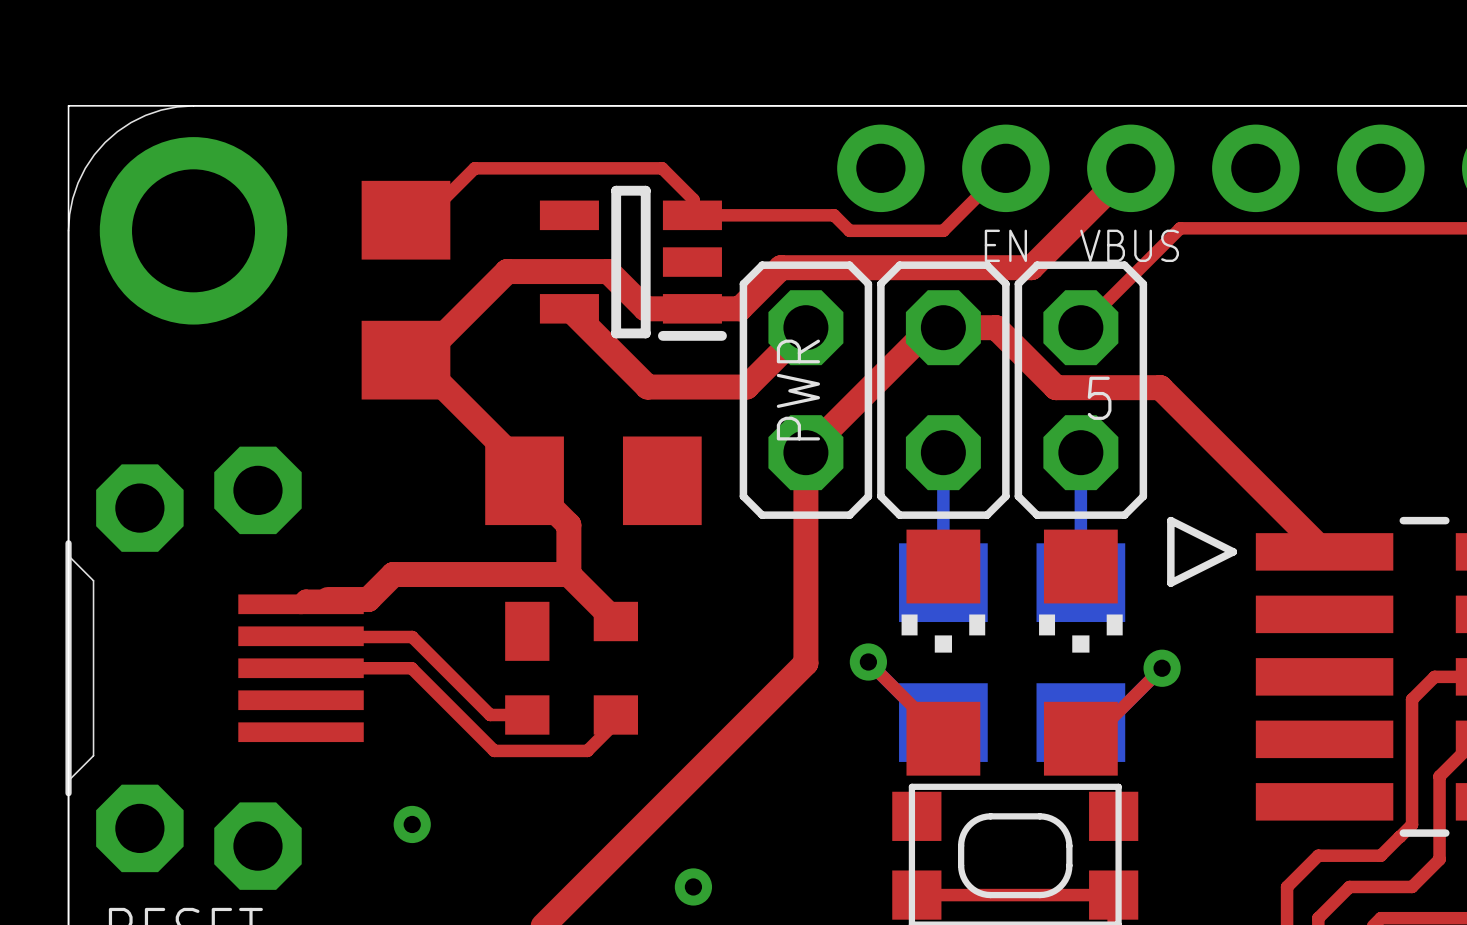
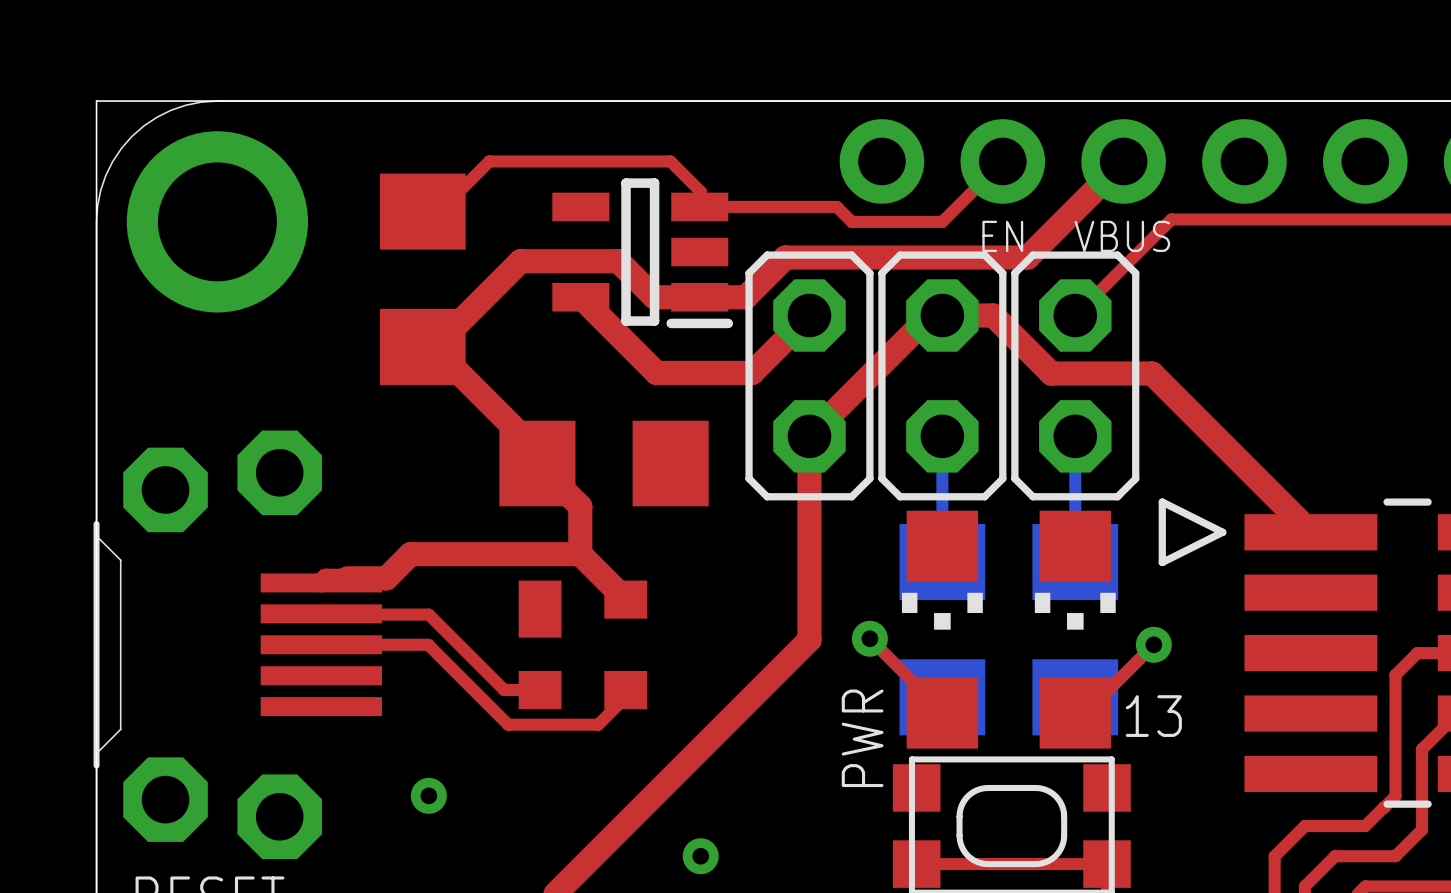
text position: PWR (798, 390) -> PWR (862, 738)
text: 5 (1099, 398) -> none
text: none -> 13 (1153, 716)

